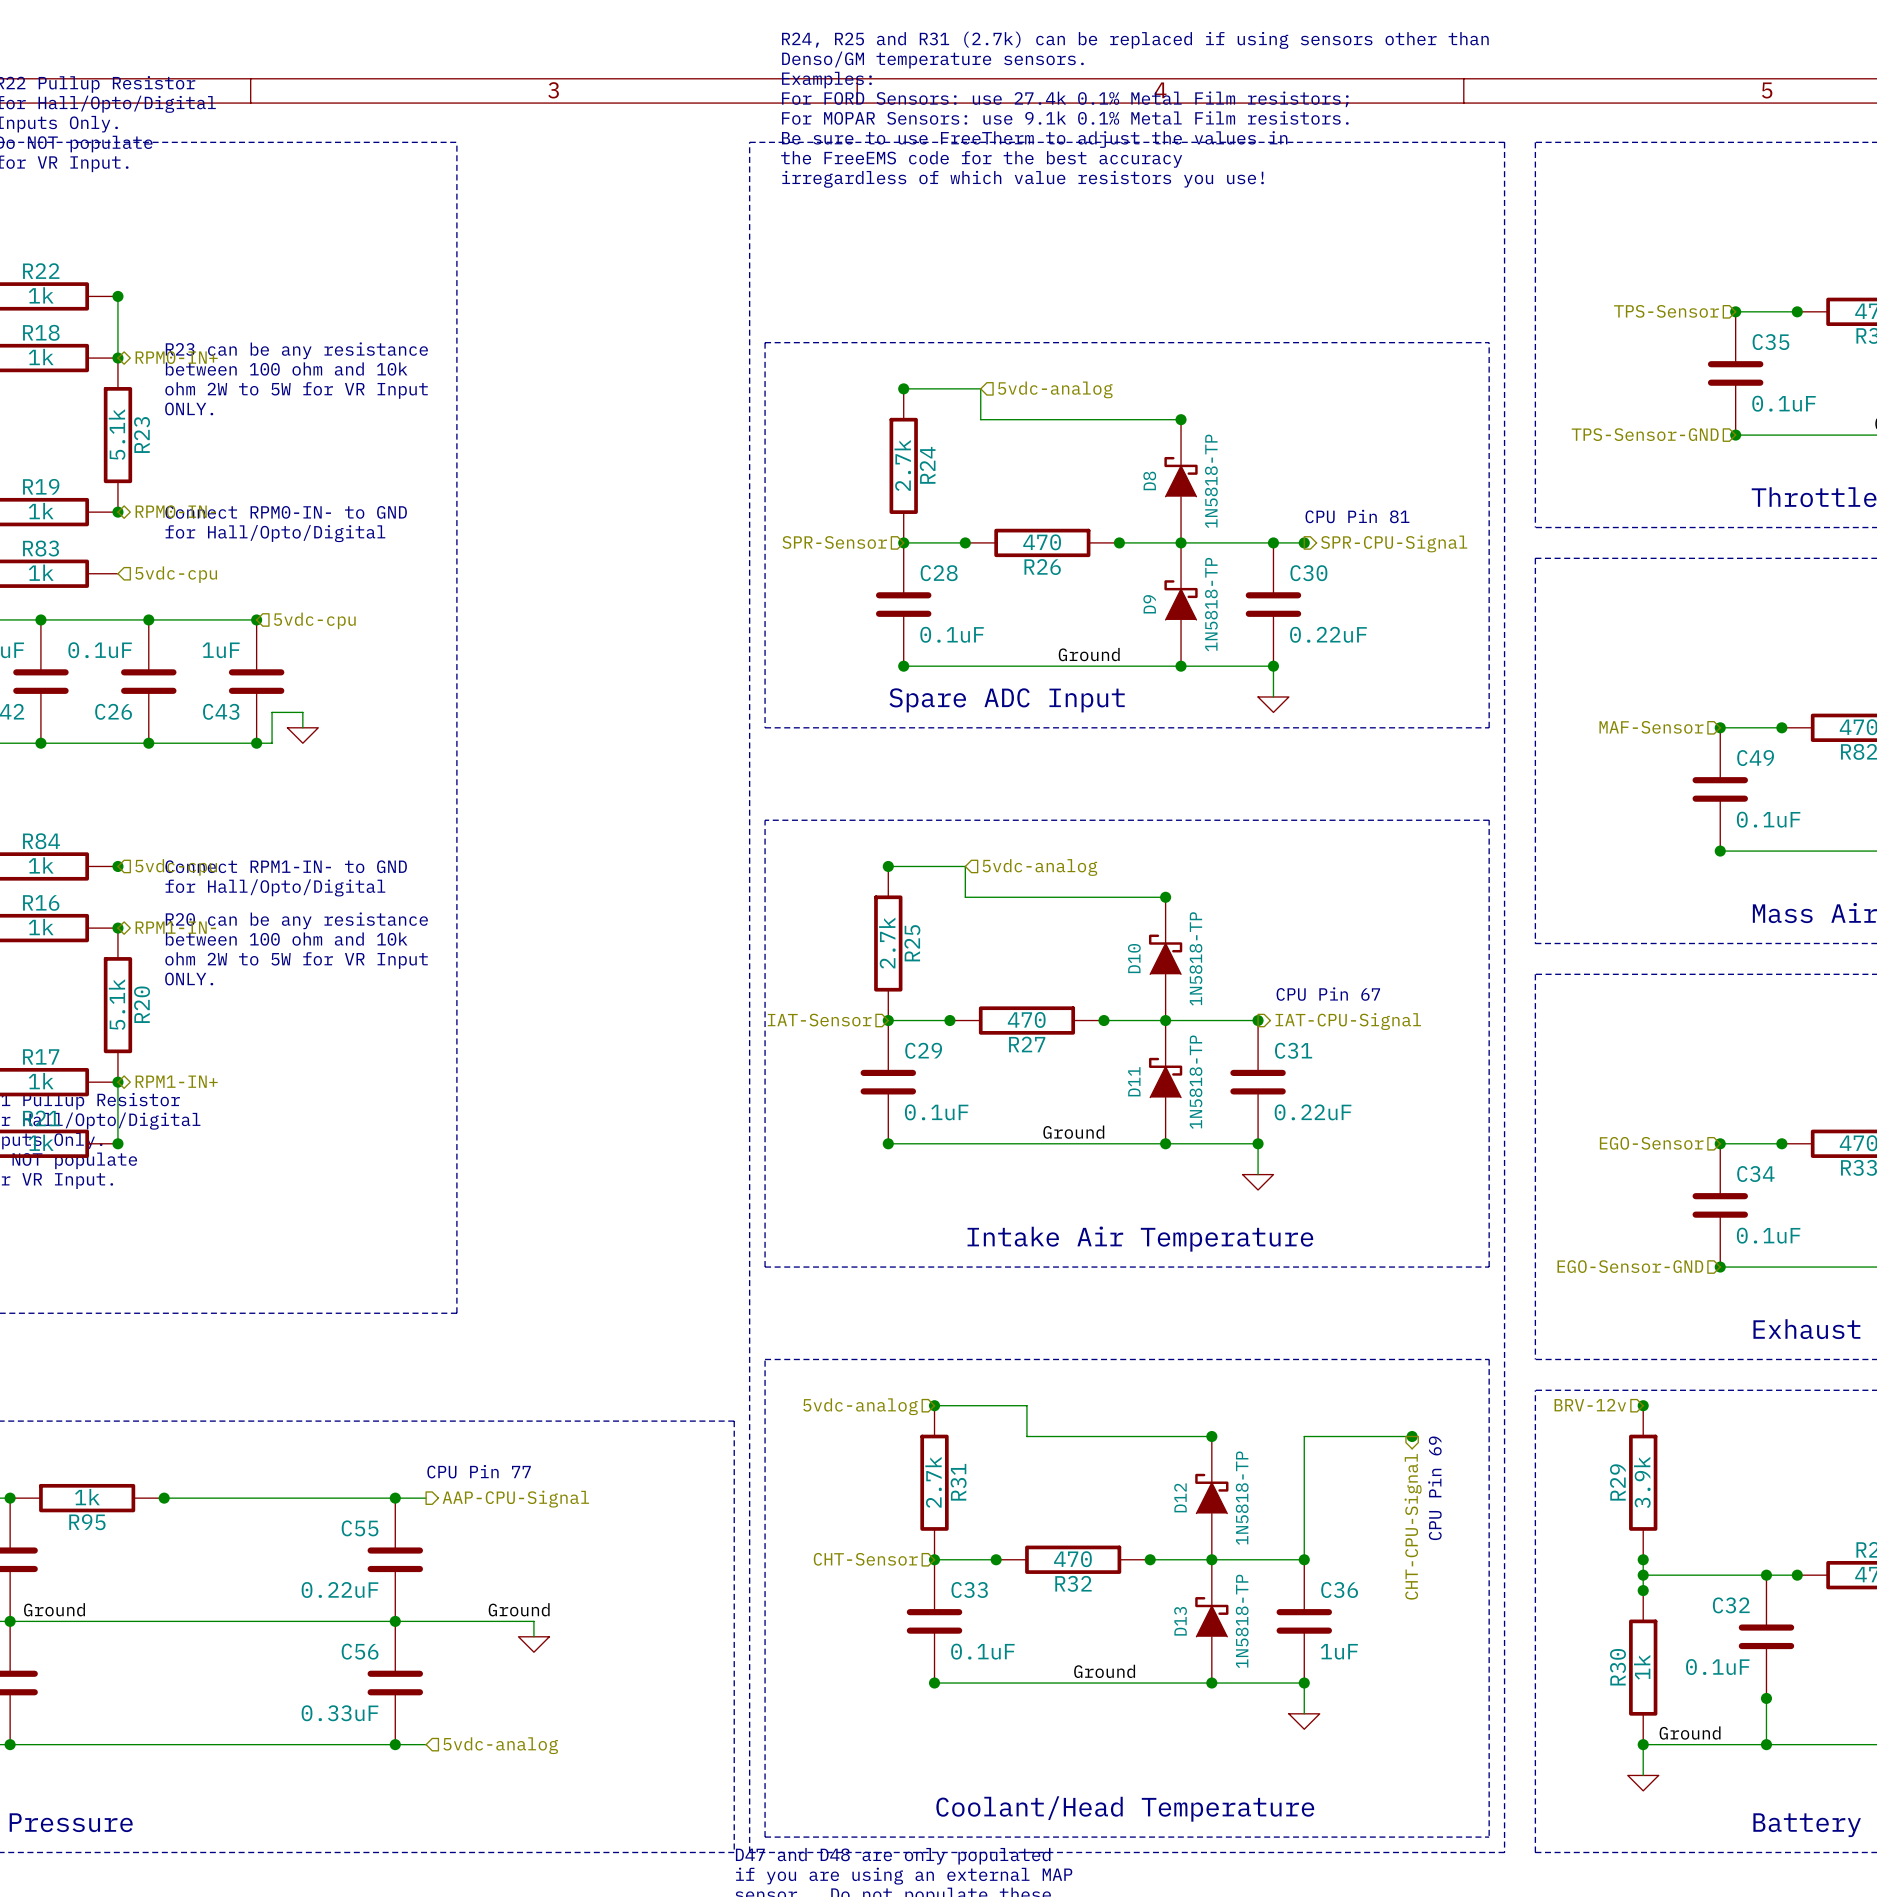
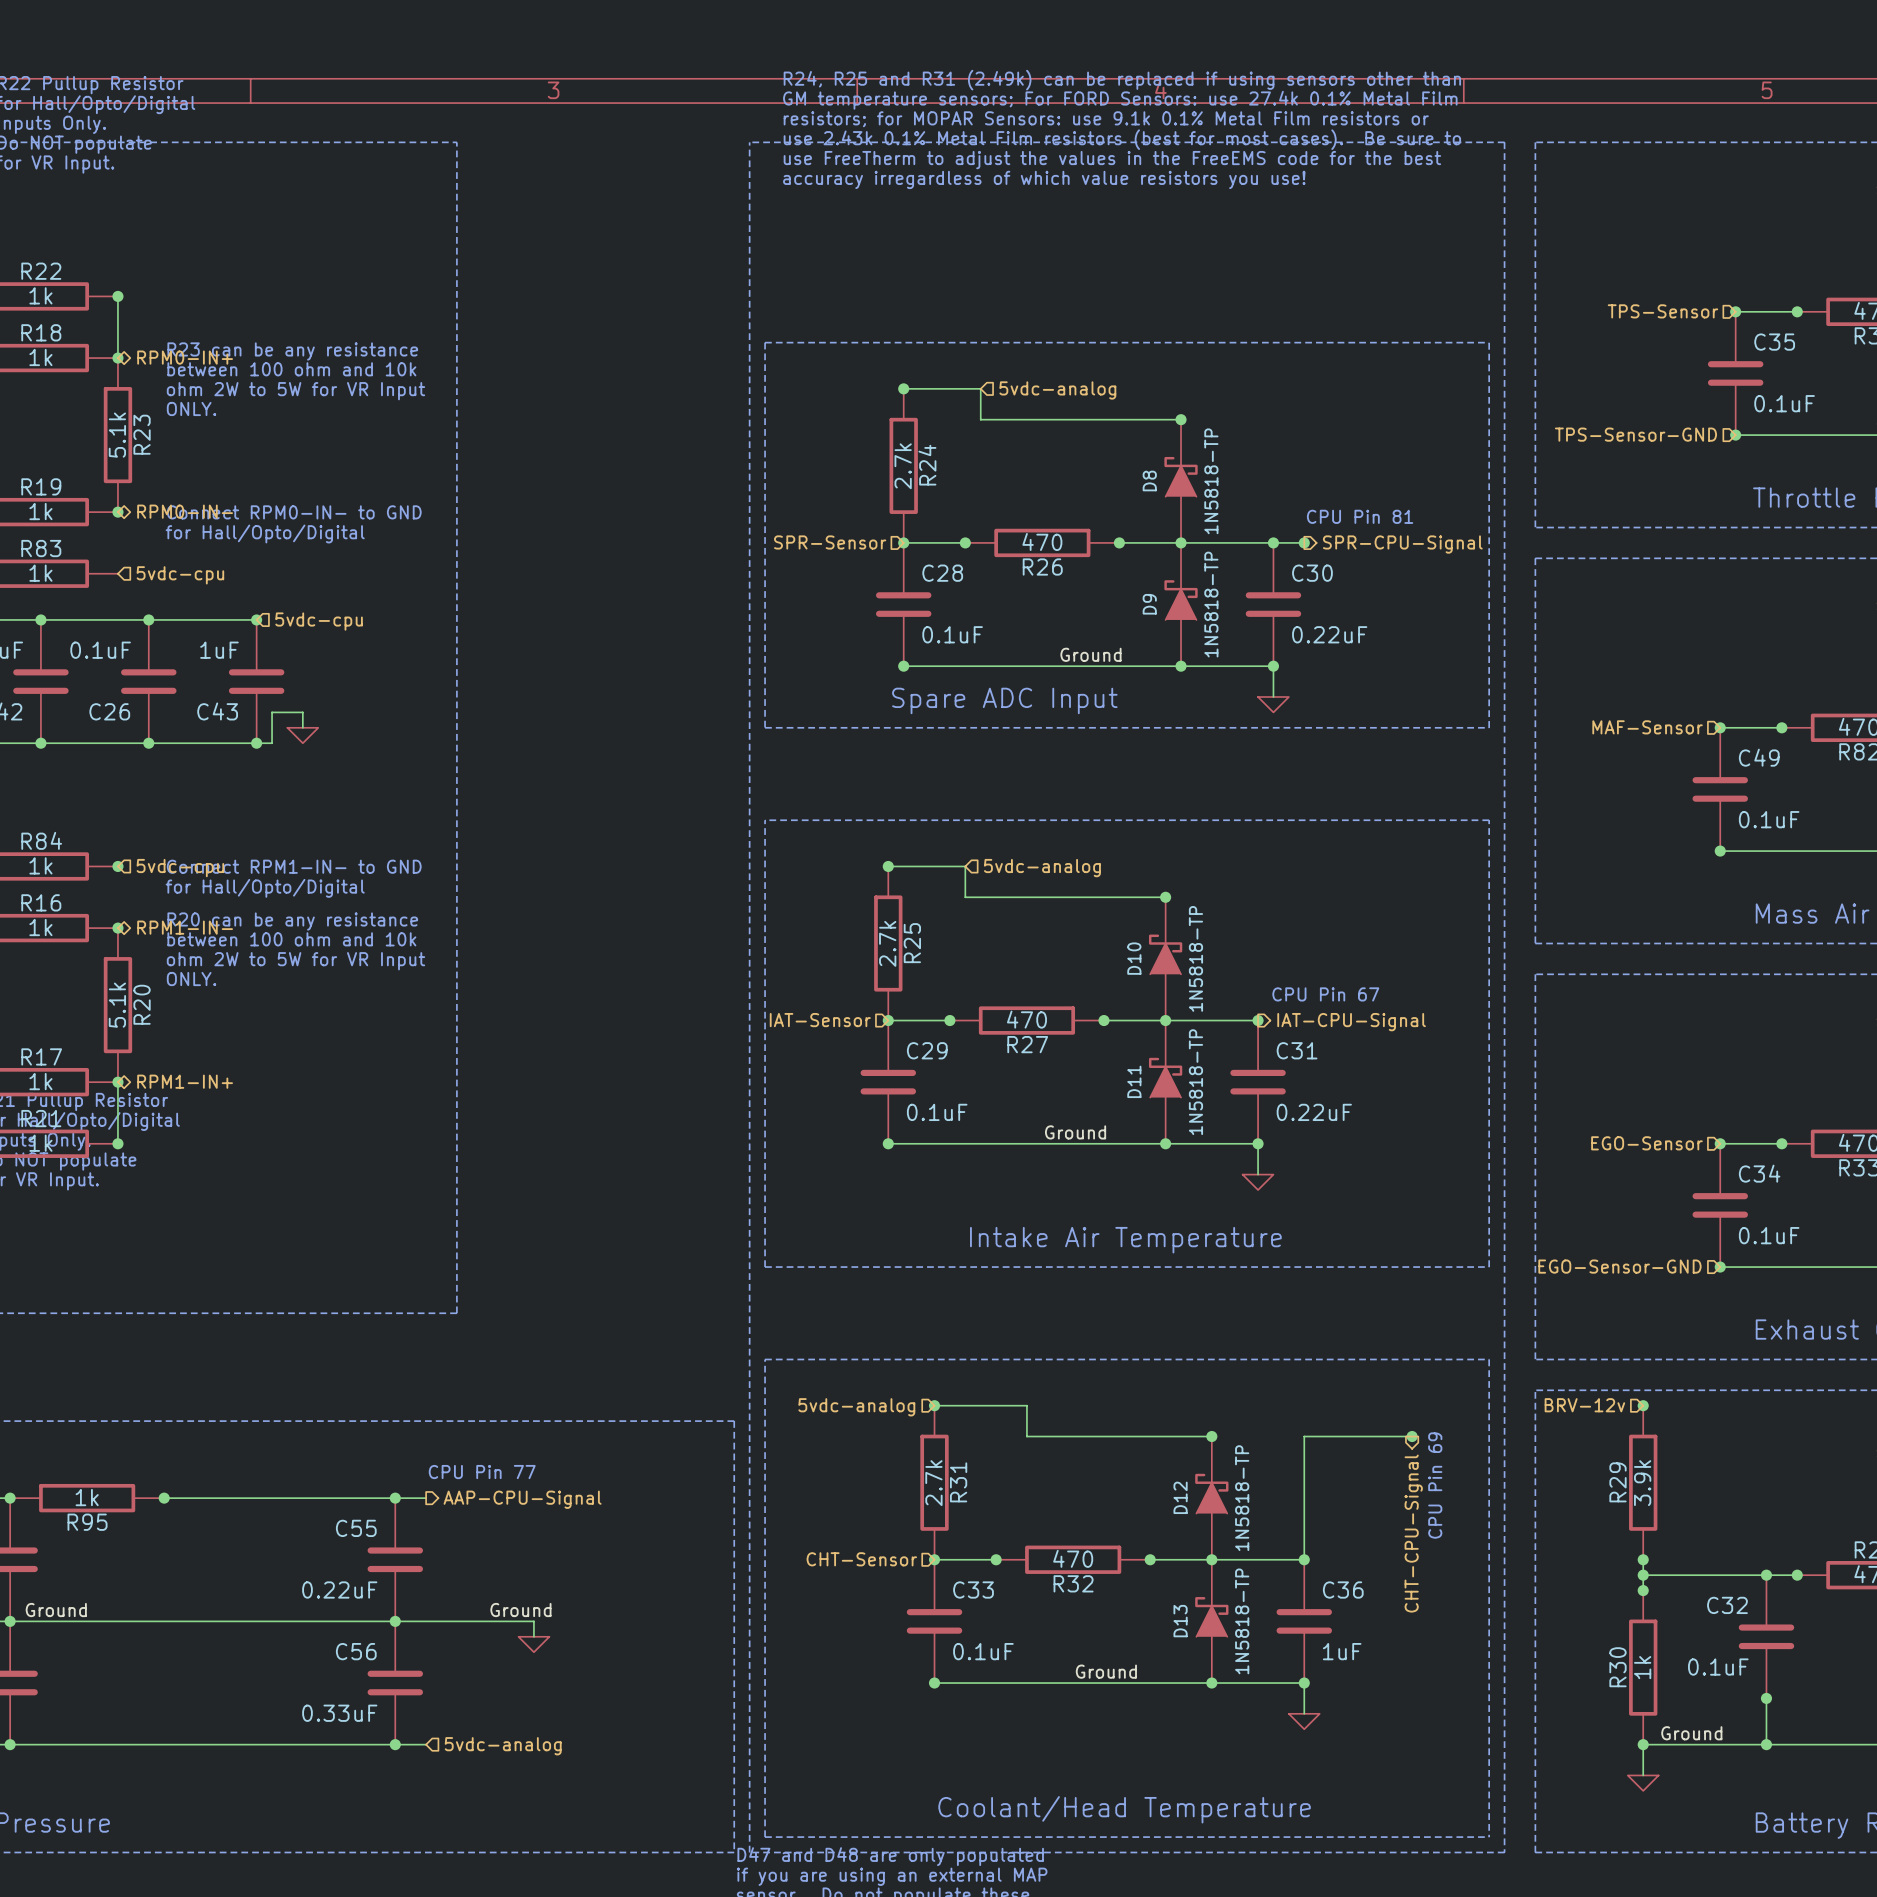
text: R24, R25 and R31 (2.7k) can be replaced if using sensors other than (1135, 40) -> none
text: Denso/GM temperature sensors. (932, 60) -> none
text: Examples: (826, 80) -> R24, R25 and R31 (2.49k) can be replaced if using sensors other than (1122, 80)
text: For FORD Sensors: use 27.4k 0.1% Metal Film resistors; (1065, 99) -> GM temperature sensors; For FORD Sensors: use 27.4k 0.1% Metal Film (1120, 100)
text: For MOPAR Sensors: use 9.1k 0.1% Metal Film resistors. (1065, 118) -> resistors; for MOPAR Sensors: use 9.1k 0.1% Metal Film resistors or (1106, 119)
text: Be sure to use FreeTherm to adjust the values in (1034, 139) -> use 2.43k 0.1% Metal Film resistors (best for most cases). Be sure to (1122, 139)
text: the FreeEMS code for the best accuracy (981, 159) -> use FreeTherm to adjust the values in the FreeEMS code for the best (1112, 160)
text: irregardless of which value resistors you use! (1023, 179) -> accuracy irregardless of which value resistors you use! (1044, 179)

